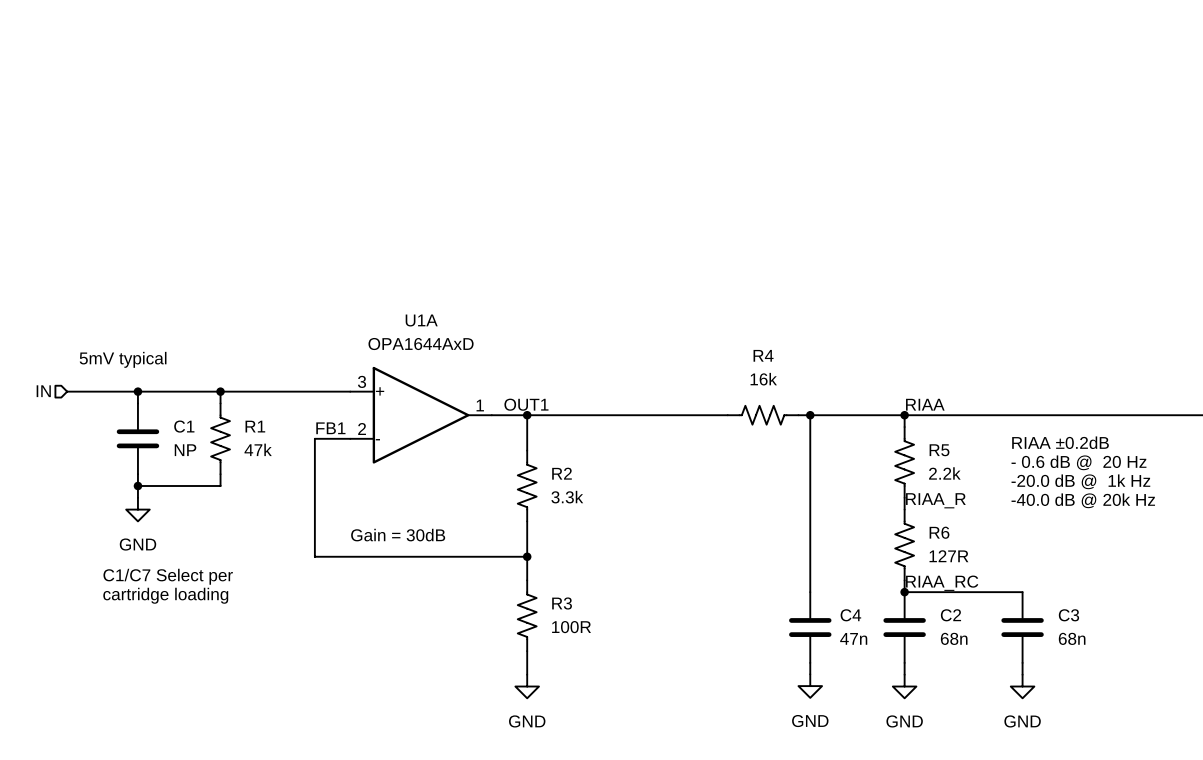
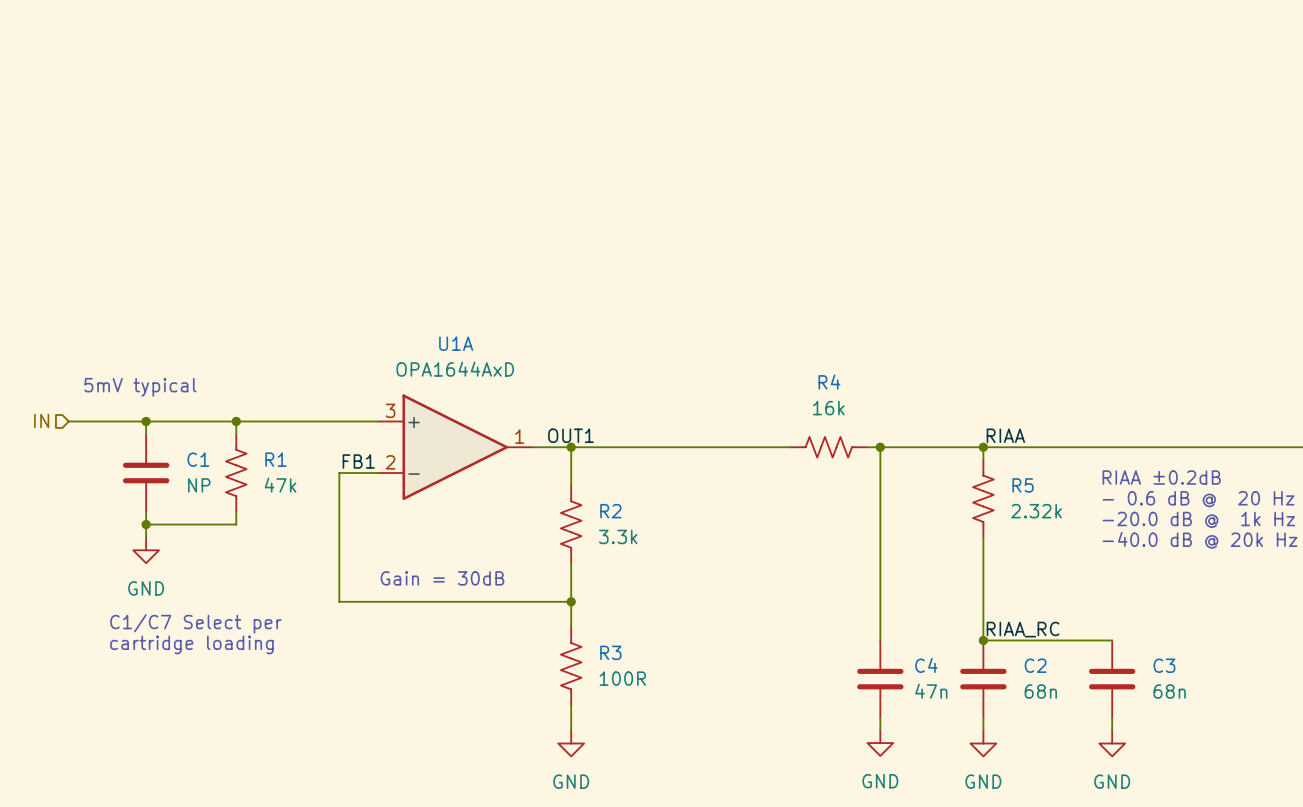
R5 value: 2.2k (944, 473) -> 2.32k (1036, 511)
label: RIAA_R (935, 500) -> none
R6: 127R (904, 544) -> none

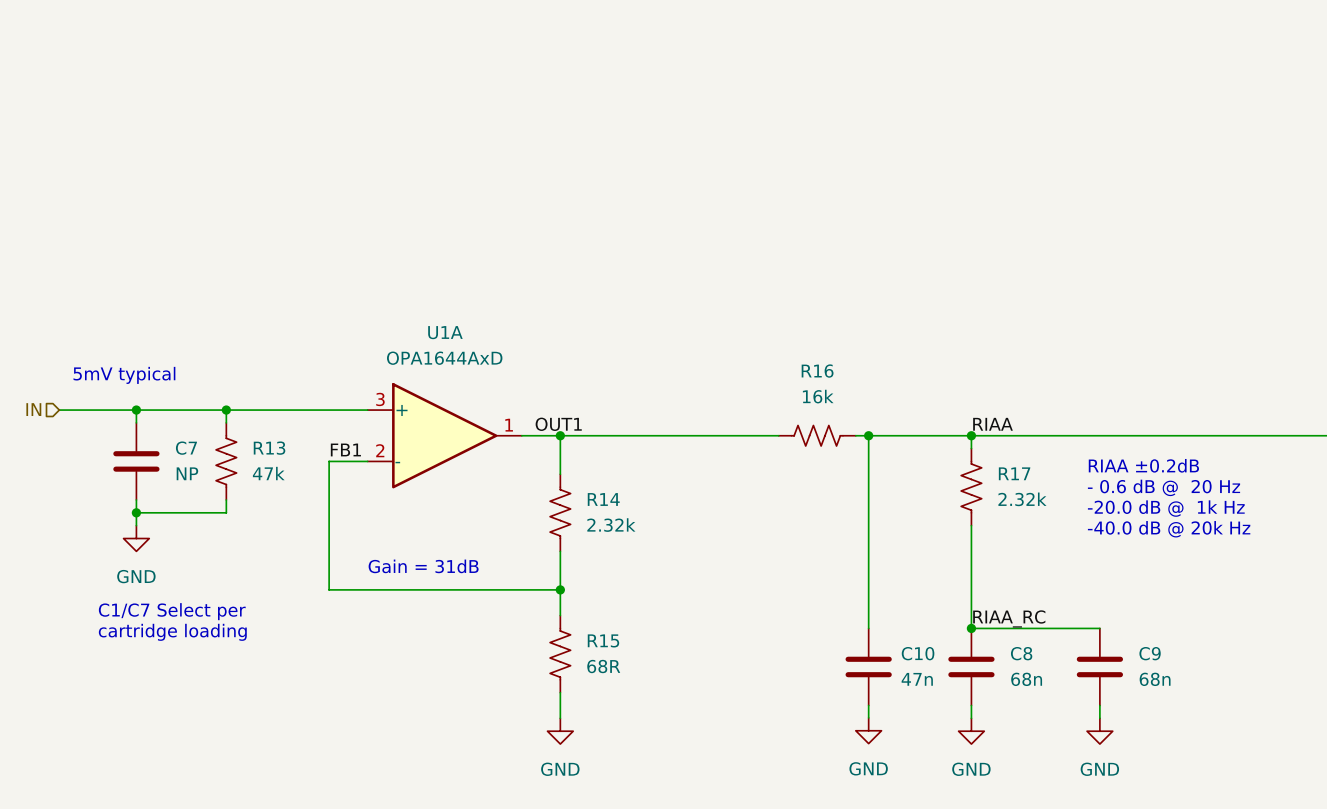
R4 name: R4 (829, 382) -> R16 (817, 371)
C1 name: C1 (198, 459) -> C7 (186, 448)
R1 name: R1 (275, 459) -> R13 (269, 448)
R5 name: R5 (1023, 485) -> R17 (1014, 473)
R2 name: R2 (610, 511) -> R14 (603, 499)
R2 value: 3.3k (618, 536) -> 2.32k (611, 525)
text: Gain = 30dB (442, 578) -> Gain = 31dB (423, 566)
R3 name: R3 (610, 652) -> R15 (603, 640)
C4 name: C4 (926, 665) -> C10 (918, 653)
C2 name: C2 (1035, 665) -> C8 (1021, 653)
C3 name: C3 (1164, 665) -> C9 (1150, 653)
R3 value: 100R (622, 678) -> 68R (603, 666)

